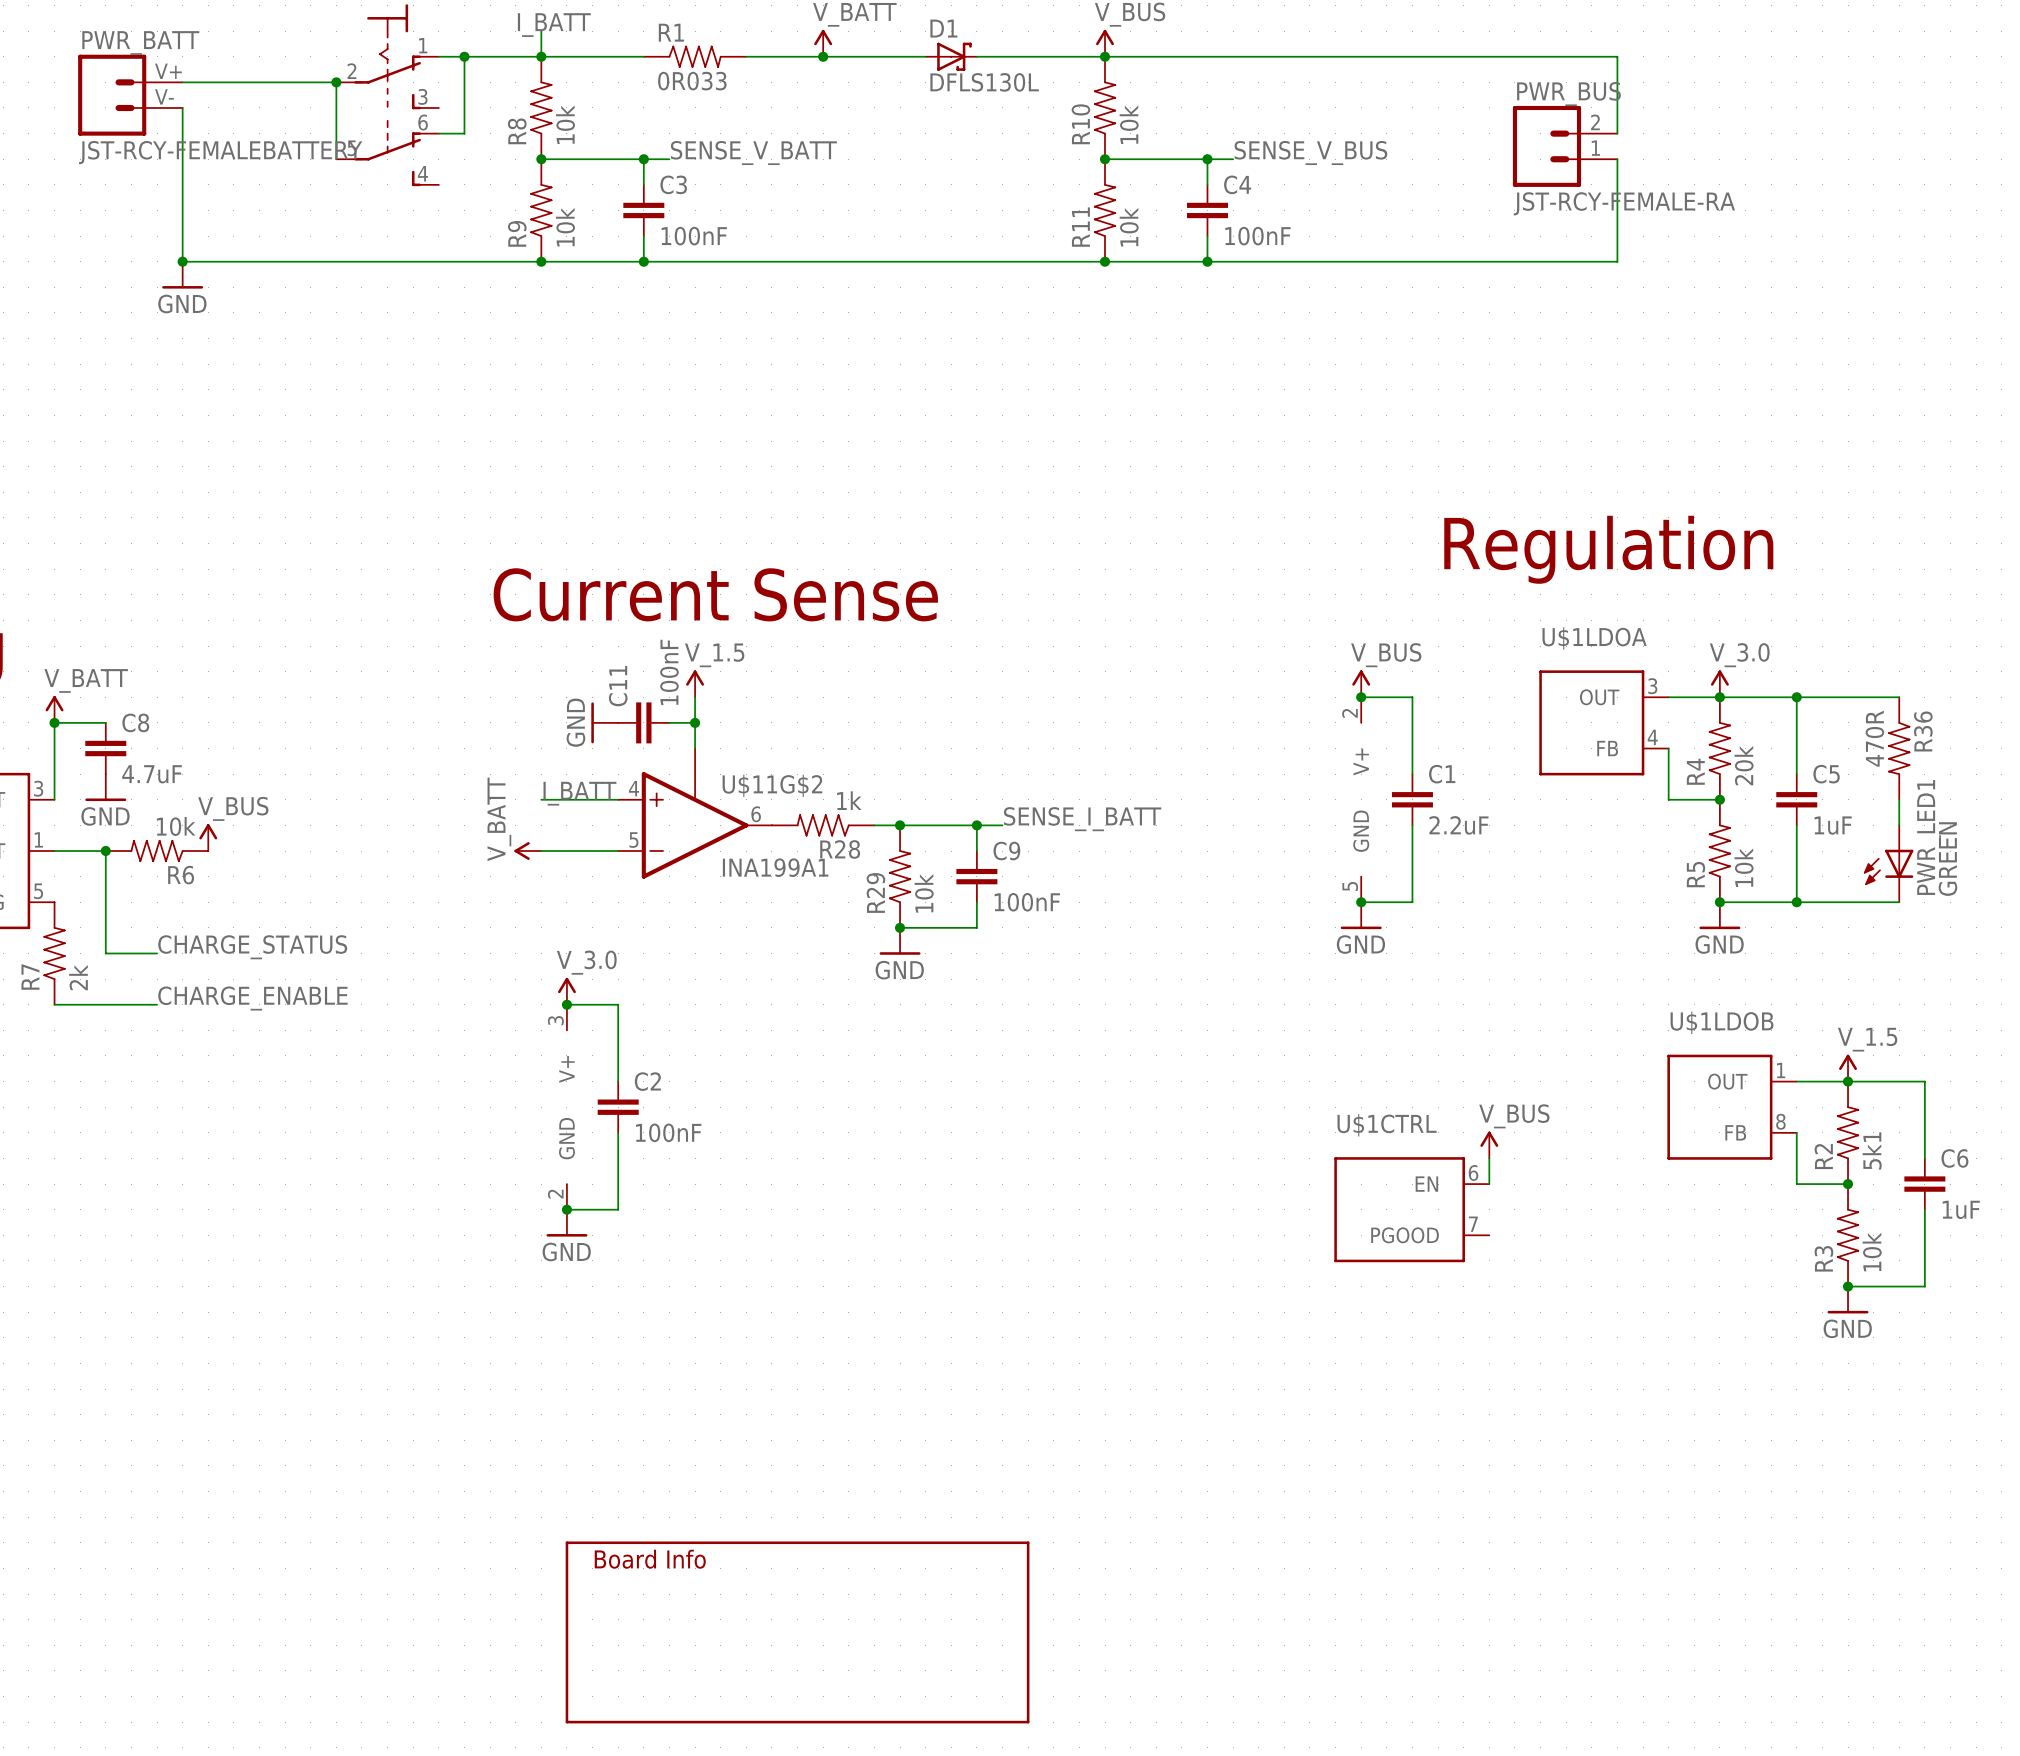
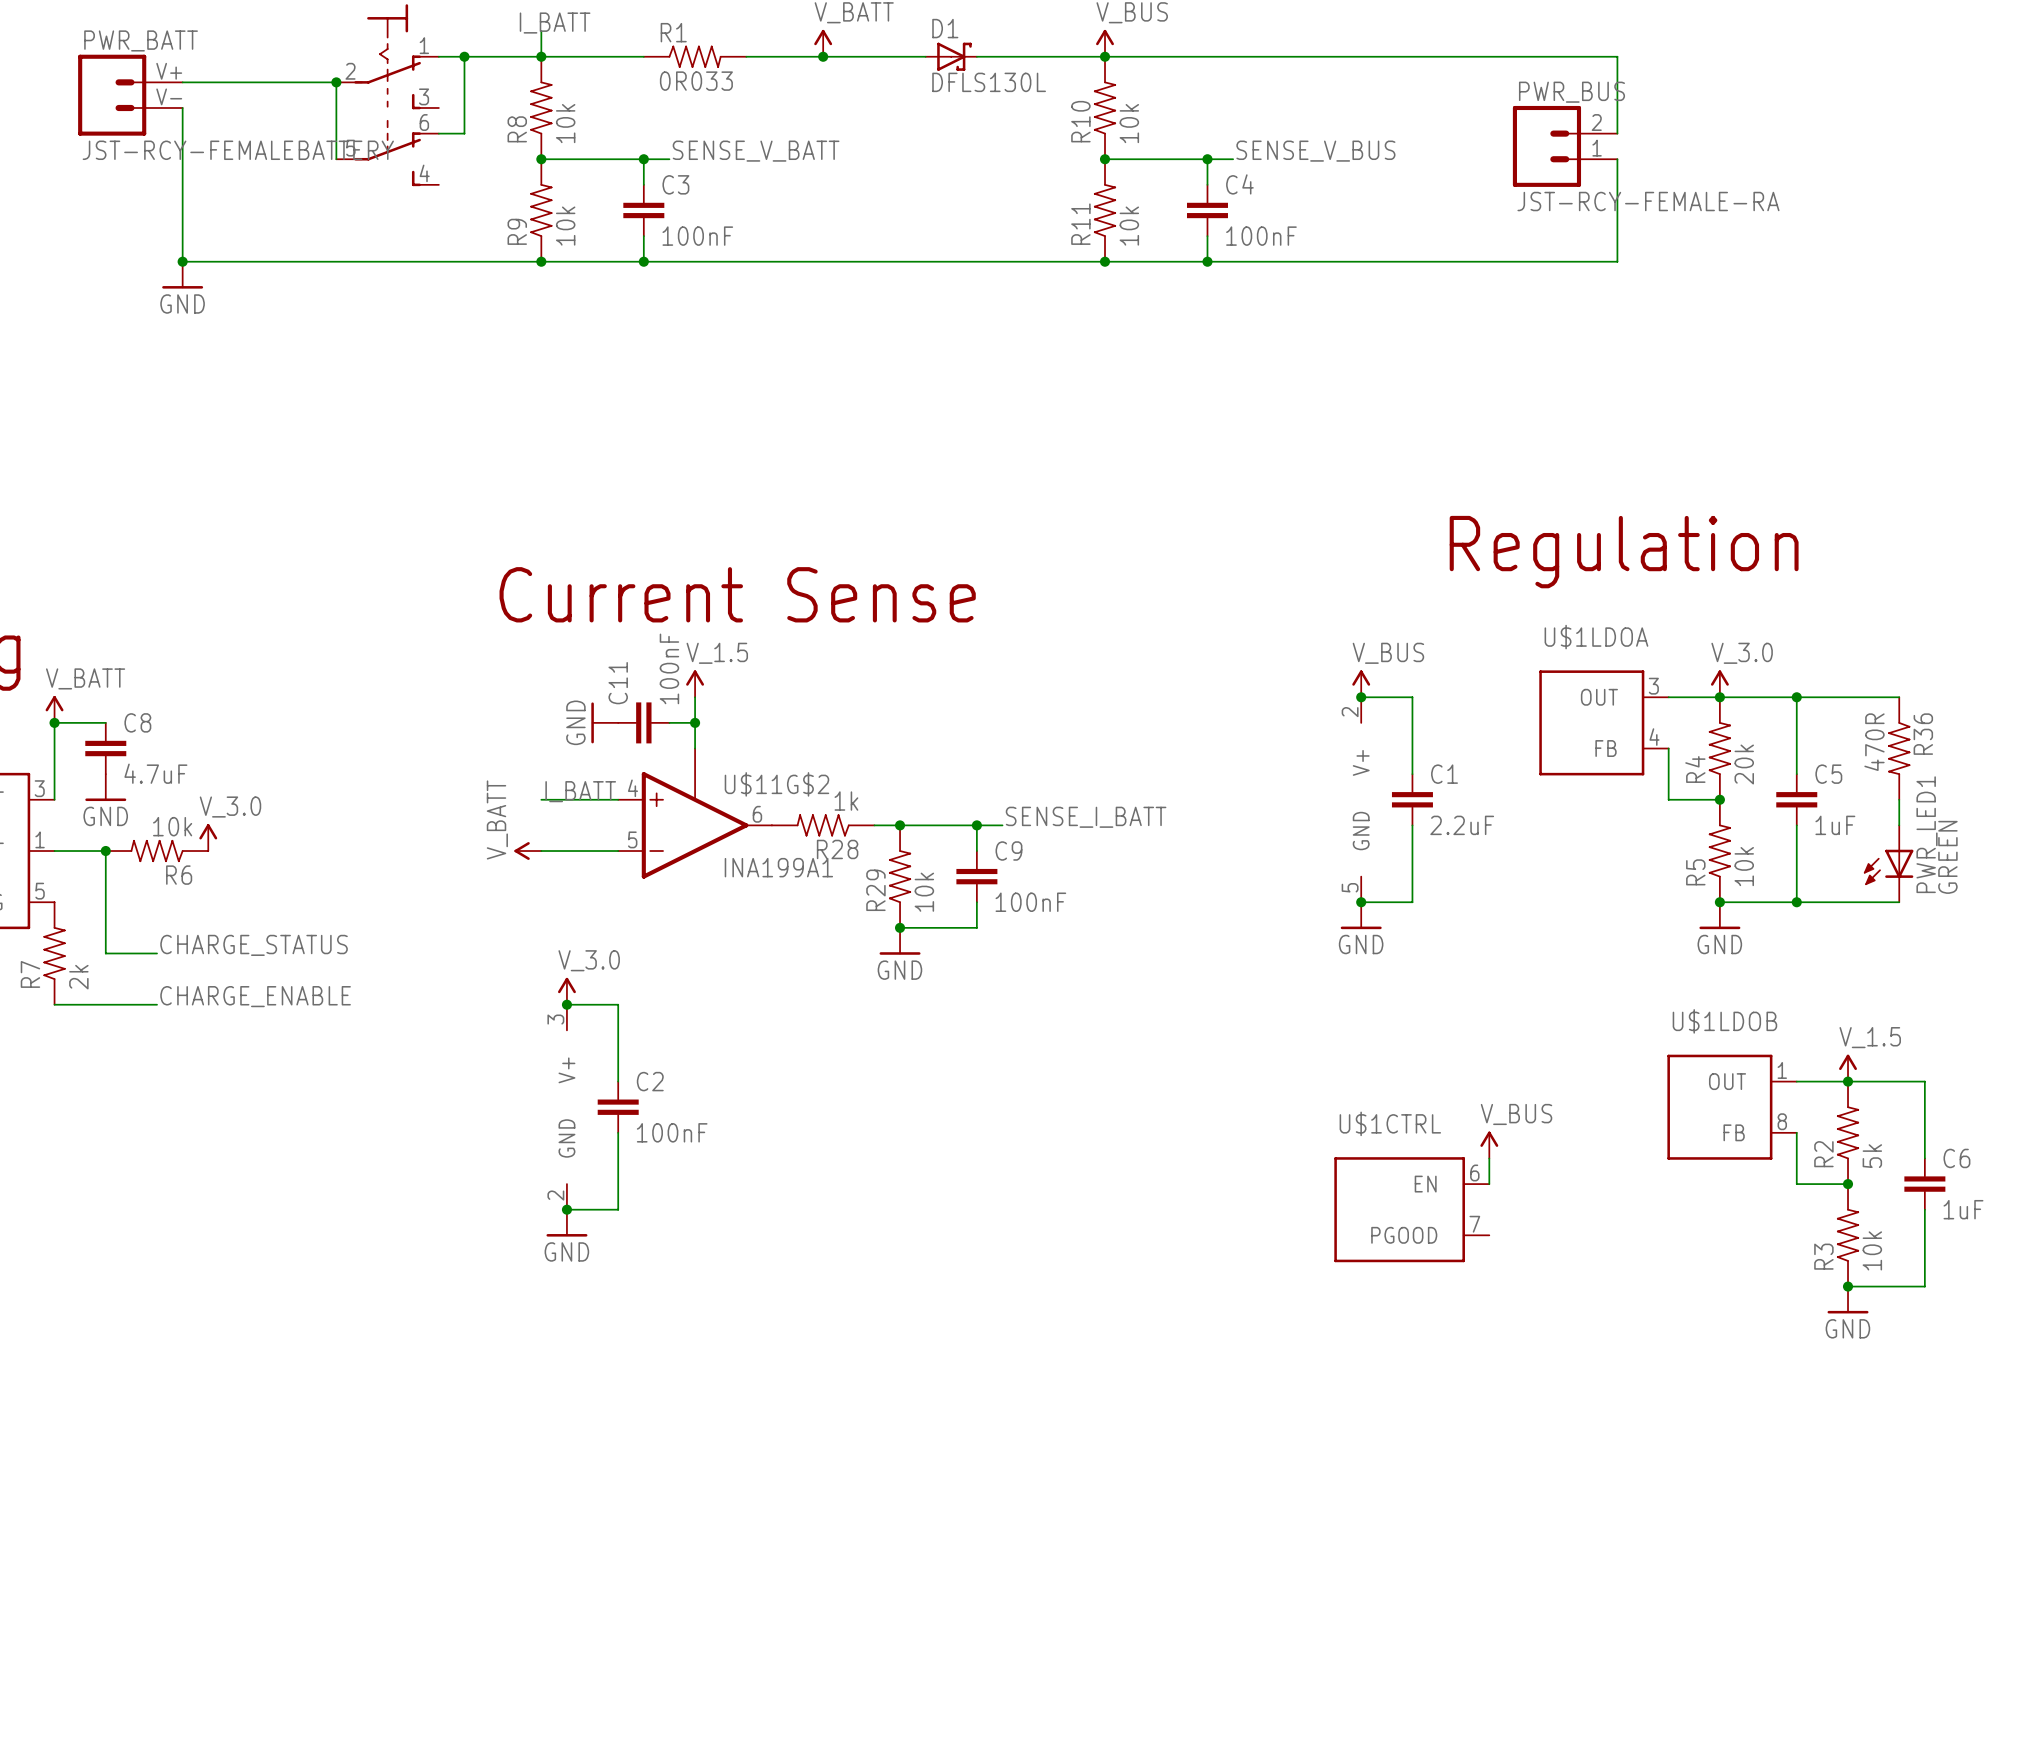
power symbol: V_BUS (208, 837) -> V_3.0 (208, 837)
R2 value: 5k1 (1872, 1150) -> 5k (1872, 1156)
part: (797, 1632) -> none

